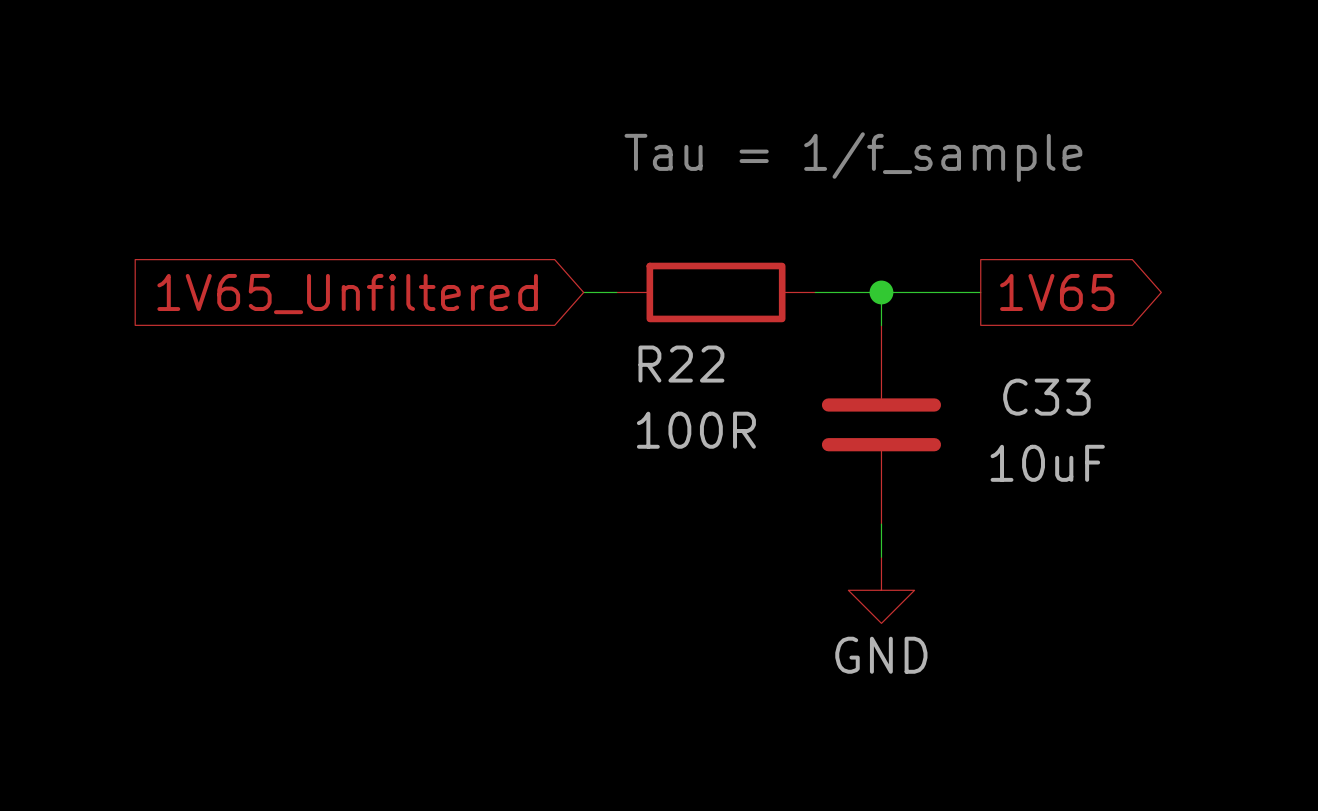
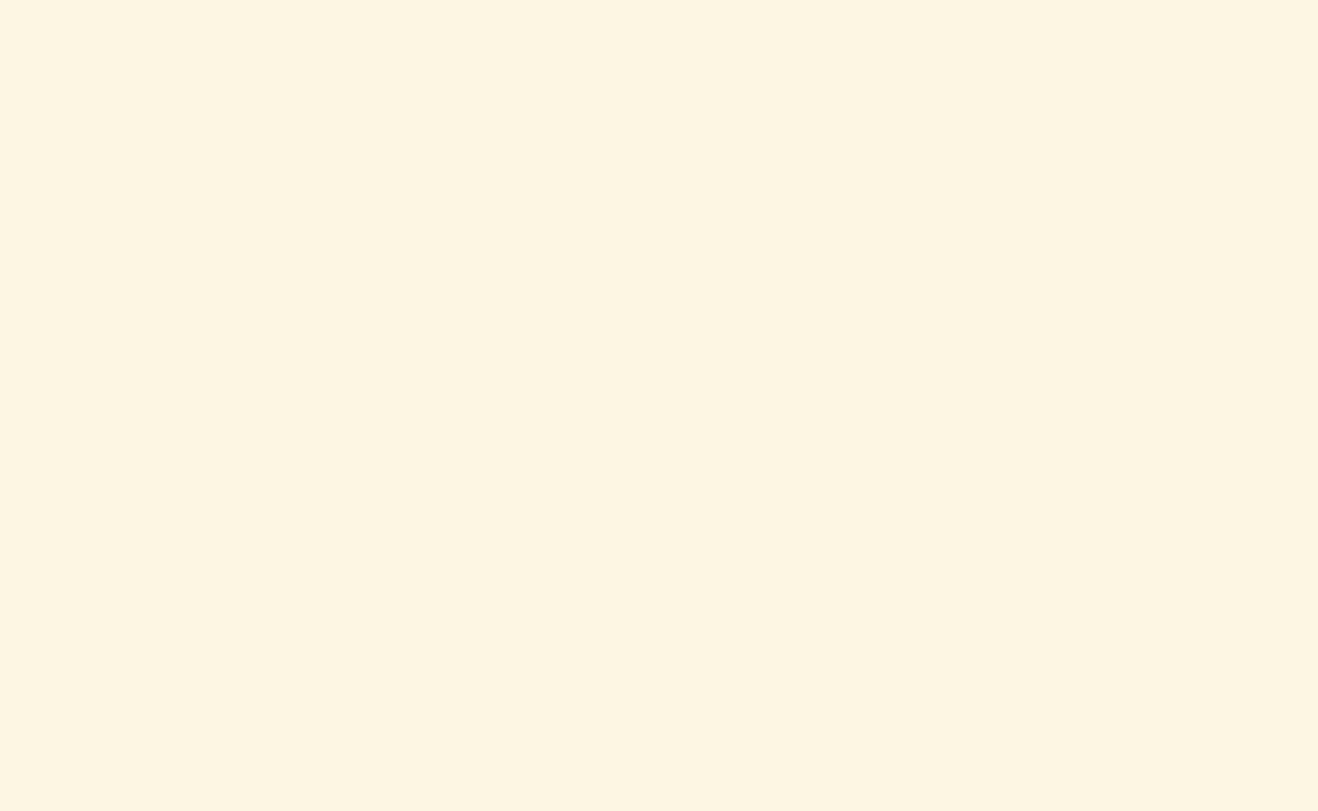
text: Tau = 1/f_sample (853, 157) -> none
wire: (583, 292) (616, 292) -> none
R22: 100R (716, 292) -> none
wire: (815, 292) (980, 292) -> none
wire: (881, 292) (881, 325) -> none
junction: (881, 292) -> none
global label: 1V65 (1057, 292) -> none
global label: 1V65_Unfiltered (347, 294) -> none
C33: 10uF (881, 424) -> none
wire: (881, 524) (881, 557) -> none
power symbol: GND (881, 590) -> none

